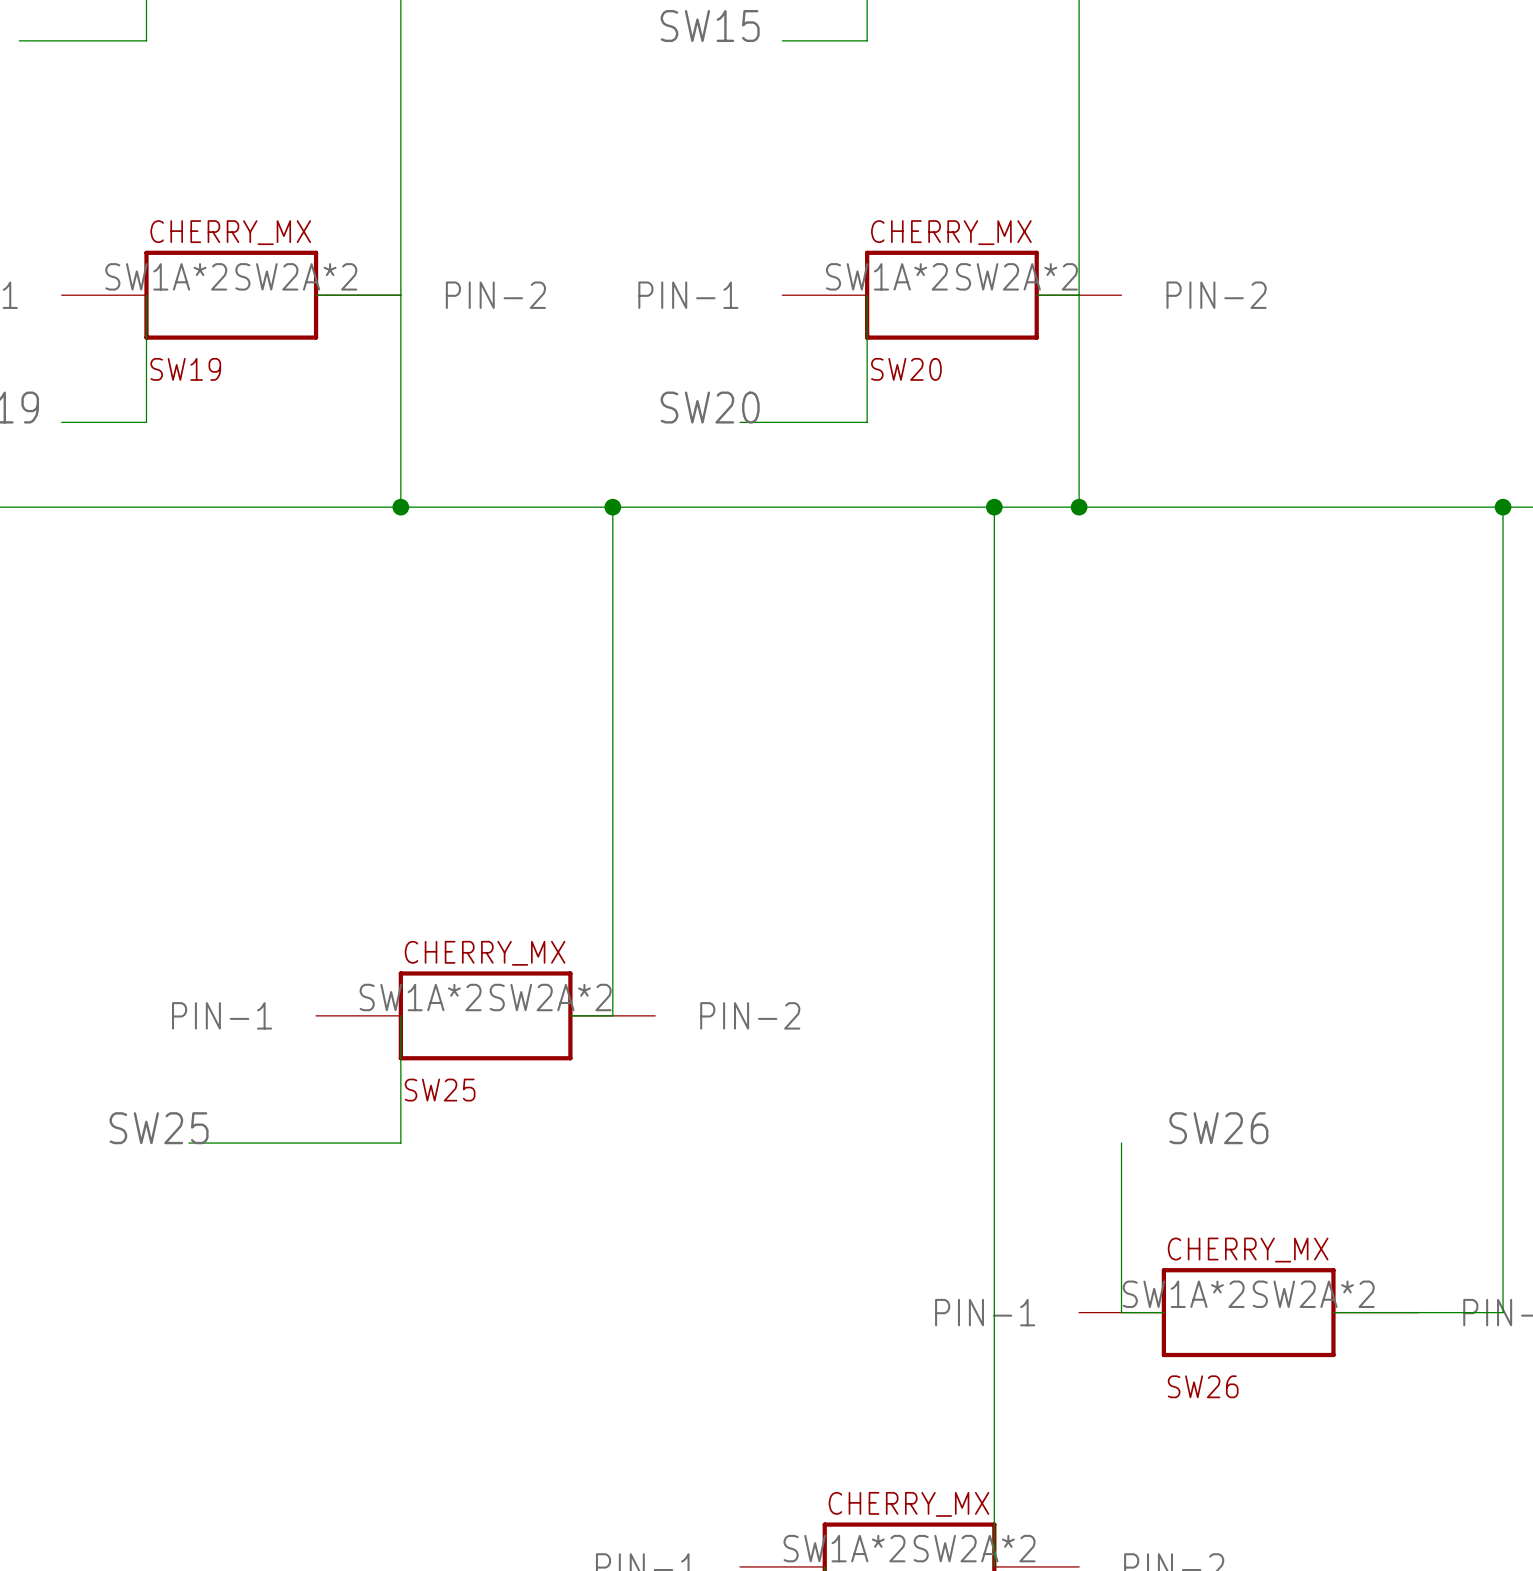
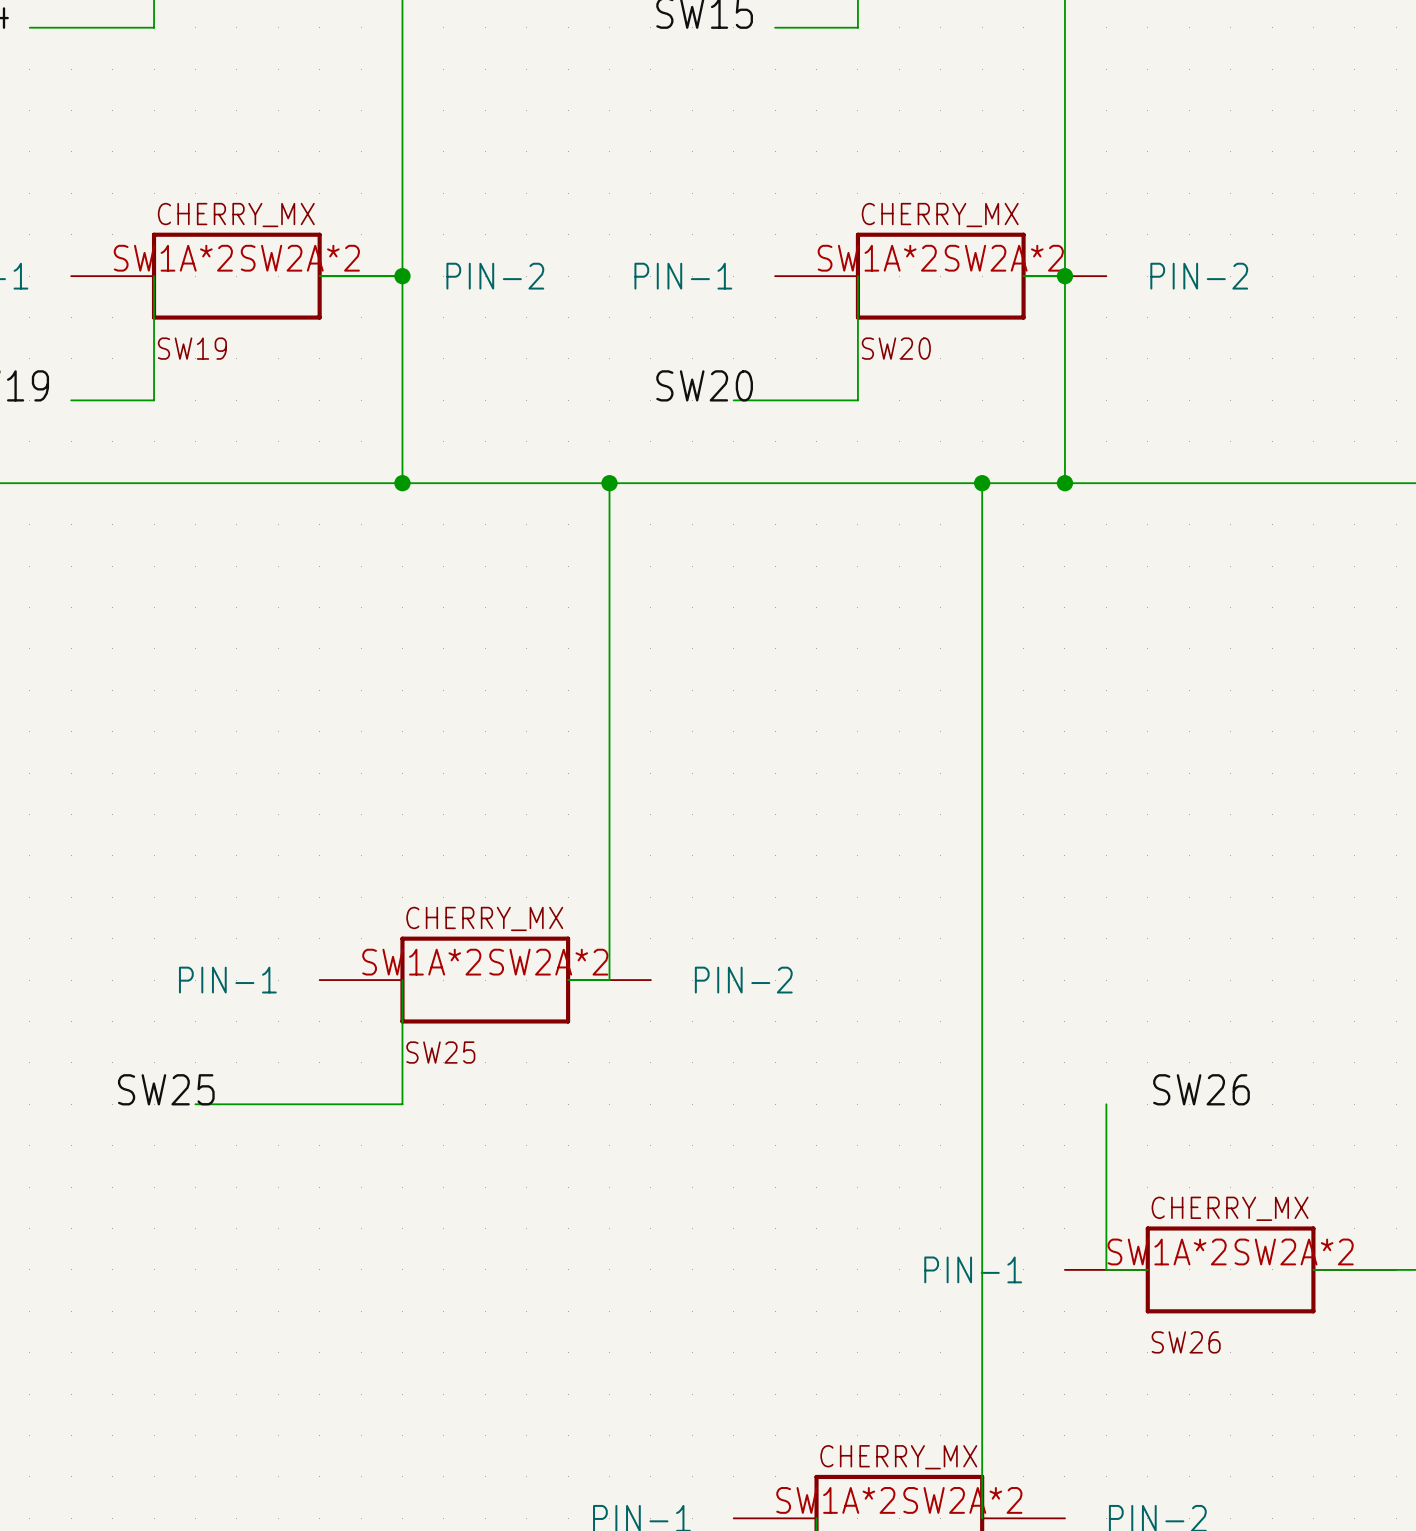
junction: none -> (402, 276)
junction: none -> (1064, 276)

